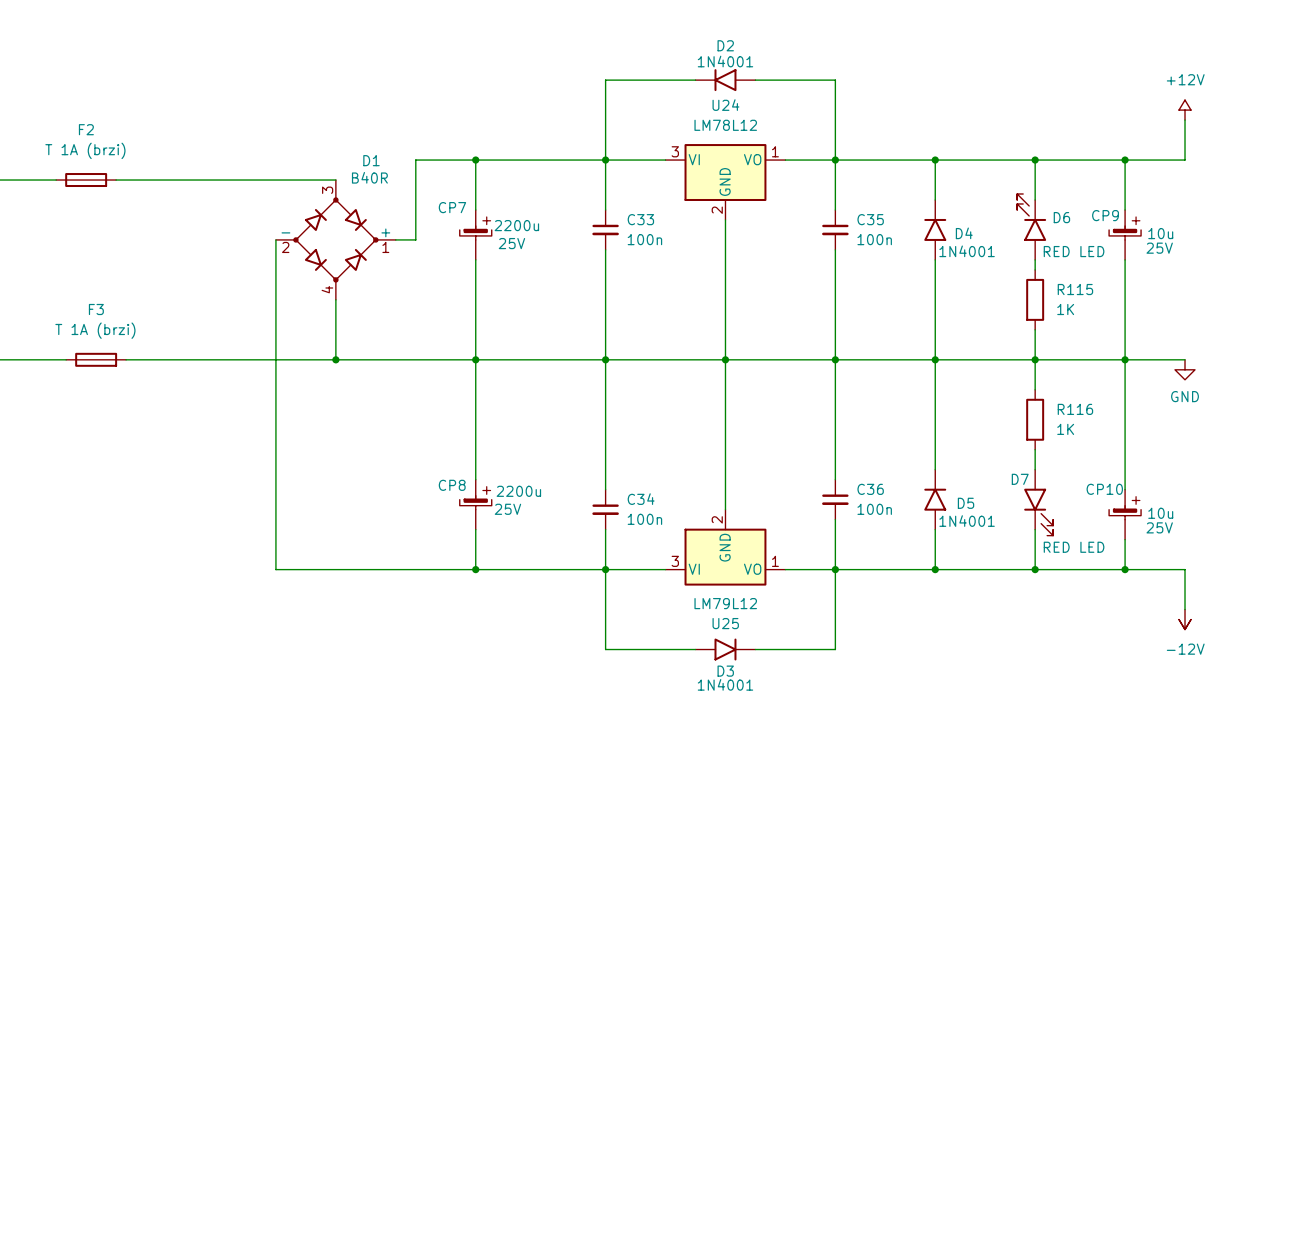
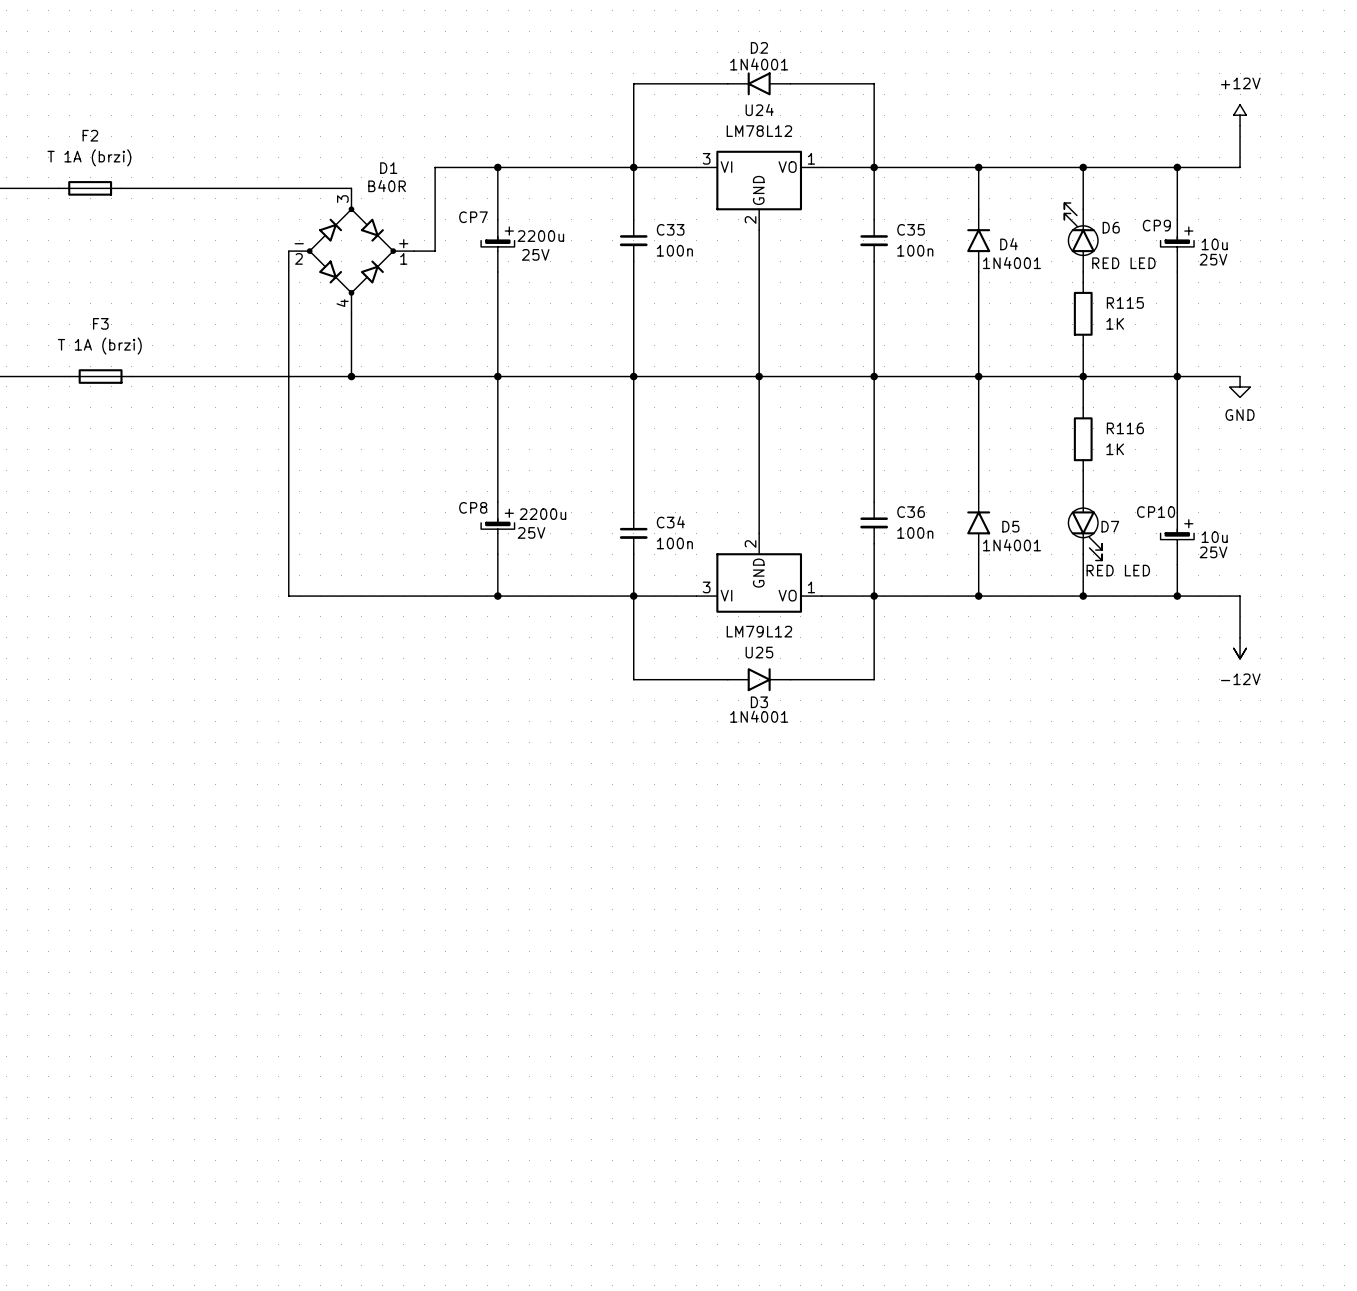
D6 symbol: [1017, 193, 1047, 260] -> [1064, 203, 1115, 273]
D7 symbol: [1024, 469, 1054, 536] -> [1051, 491, 1103, 561]
D7 name position: D7 (1020, 479) -> D7 (1110, 526)

